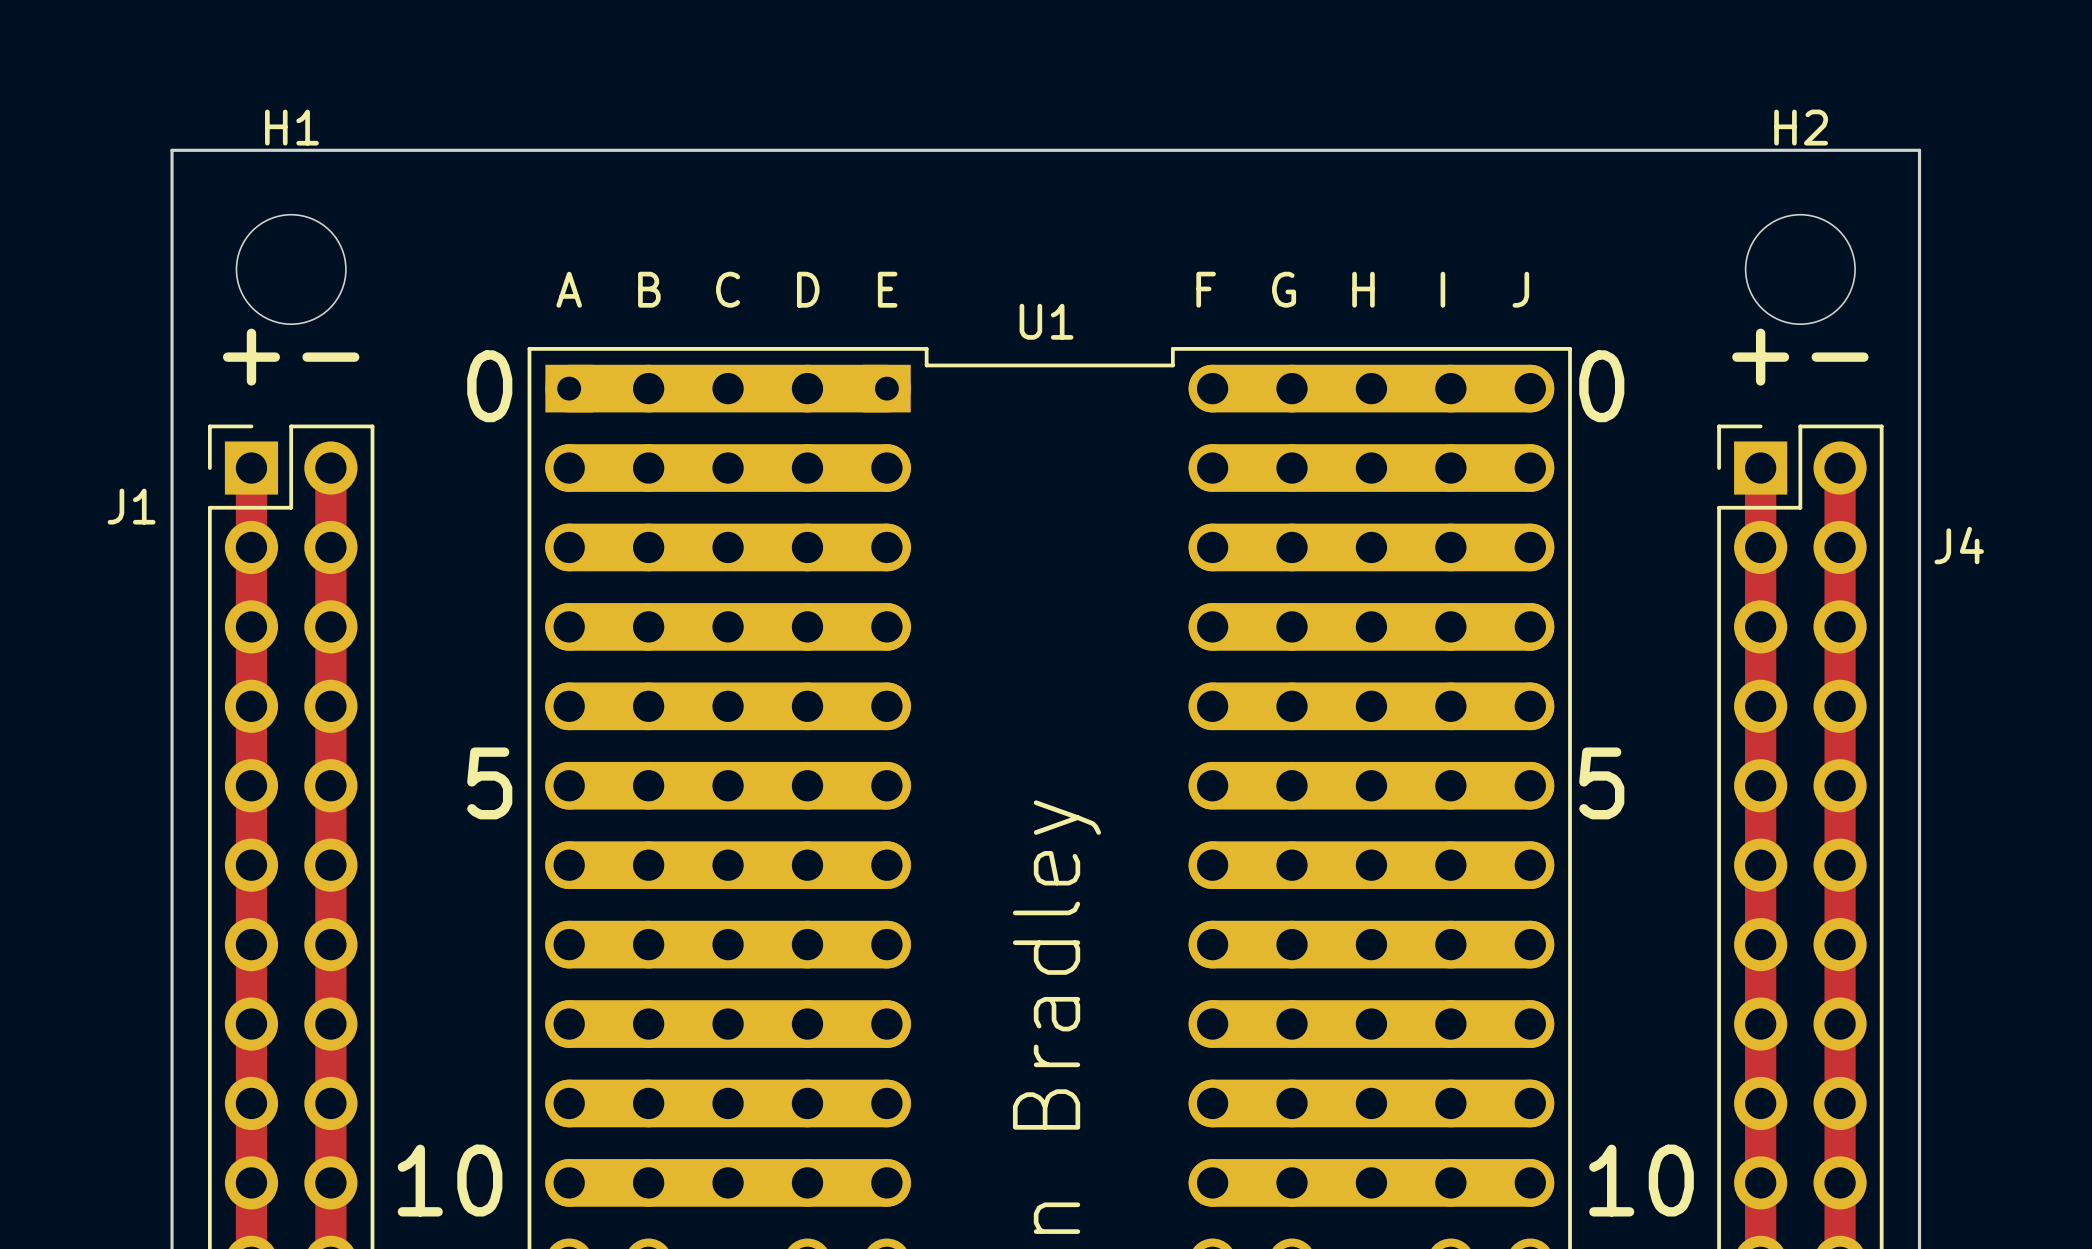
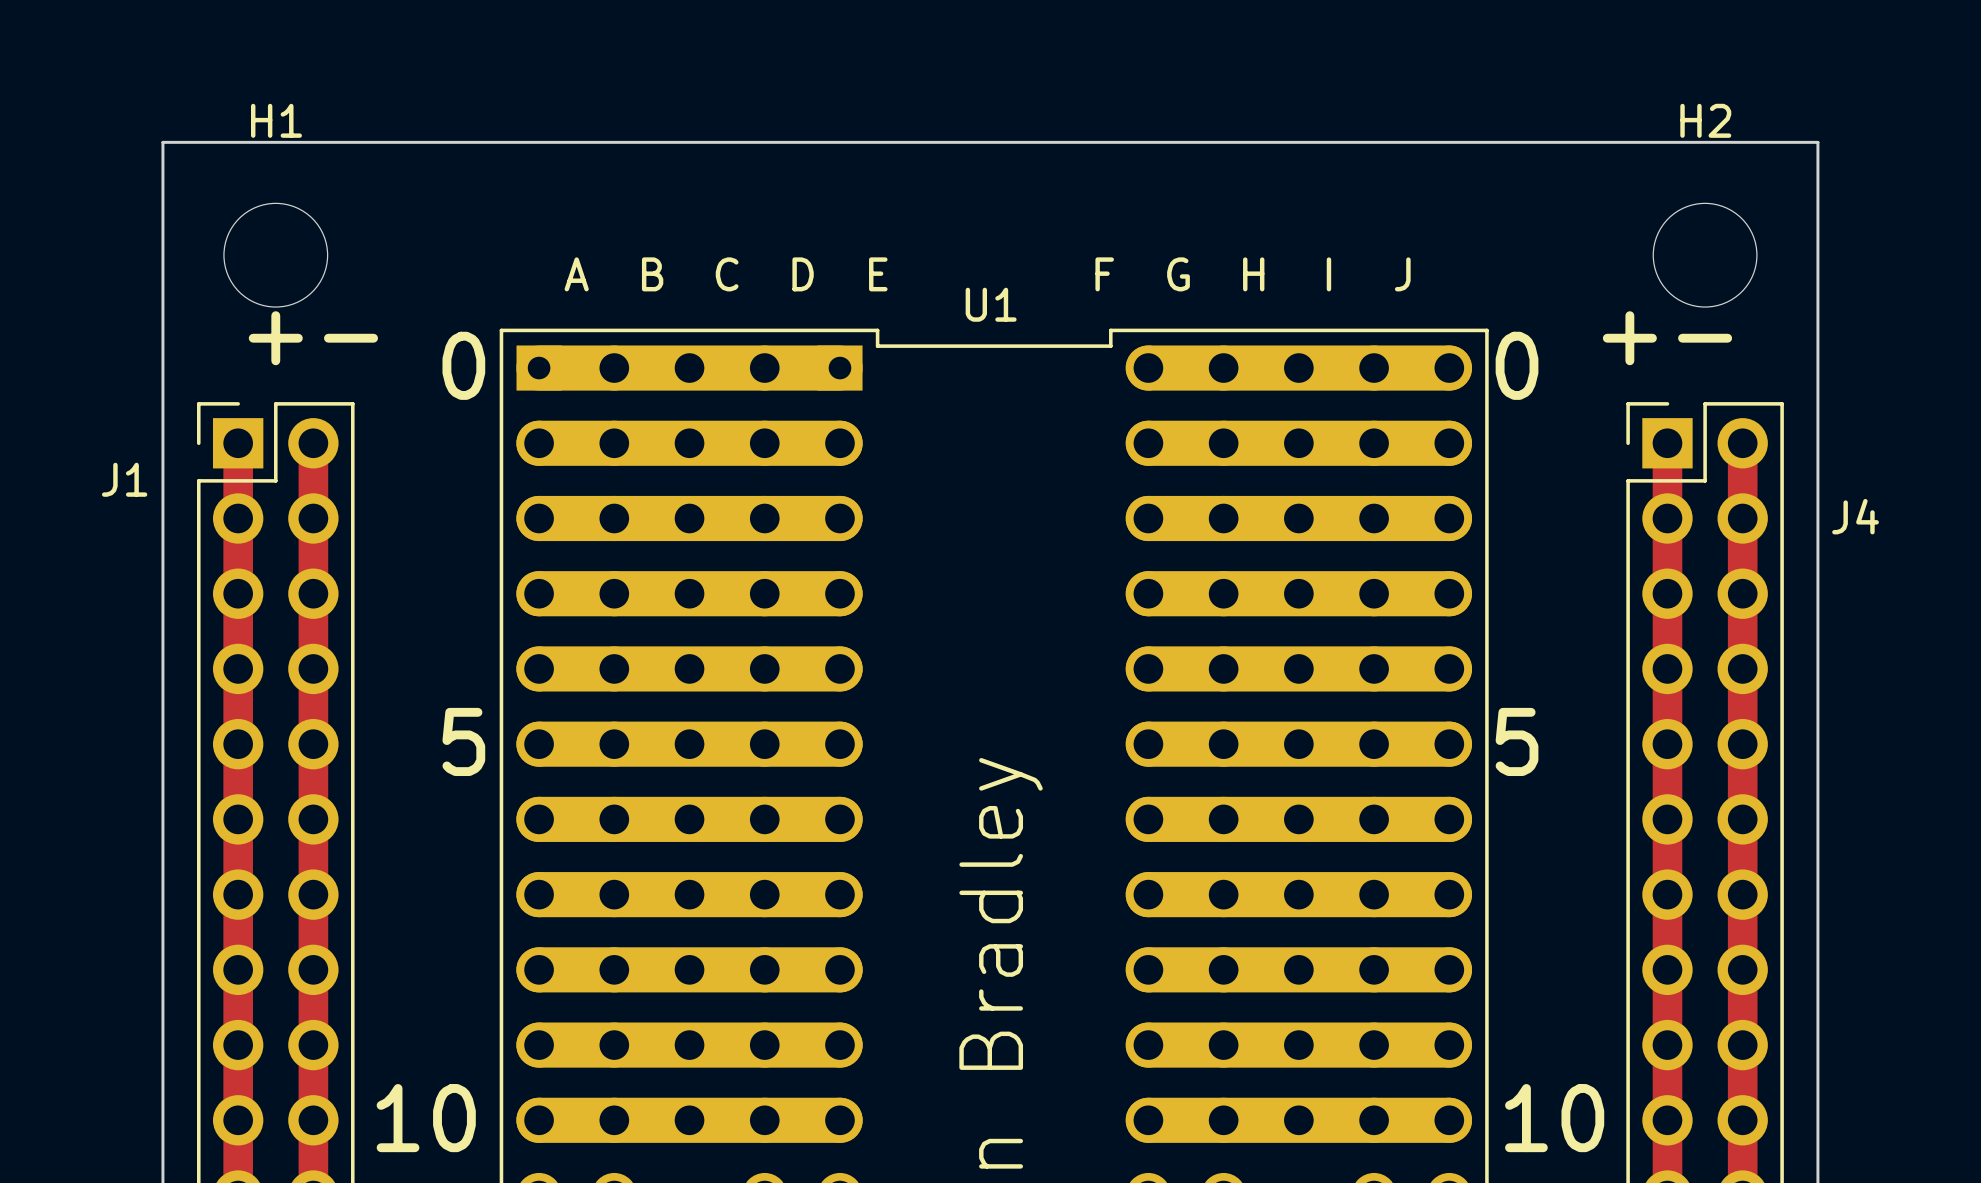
text position: A (569, 289) -> A (576, 274)
text position: B (649, 289) -> B (652, 274)
text position: C (728, 289) -> C (727, 274)
text position: D (808, 289) -> D (803, 274)
text position: E (887, 289) -> E (878, 274)
text position: F (1206, 289) -> F (1104, 274)
text position: G (1284, 289) -> G (1178, 274)
text position: H (1363, 289) -> H (1253, 274)
text position: I (1442, 289) -> I (1328, 274)
text position: J (1520, 289) -> J (1402, 274)
text position: + (251, 357) -> + (275, 338)
text position: - (330, 357) -> - (351, 338)
text position: + (1760, 357) -> + (1629, 338)
text position: - (1840, 357) -> - (1705, 338)

